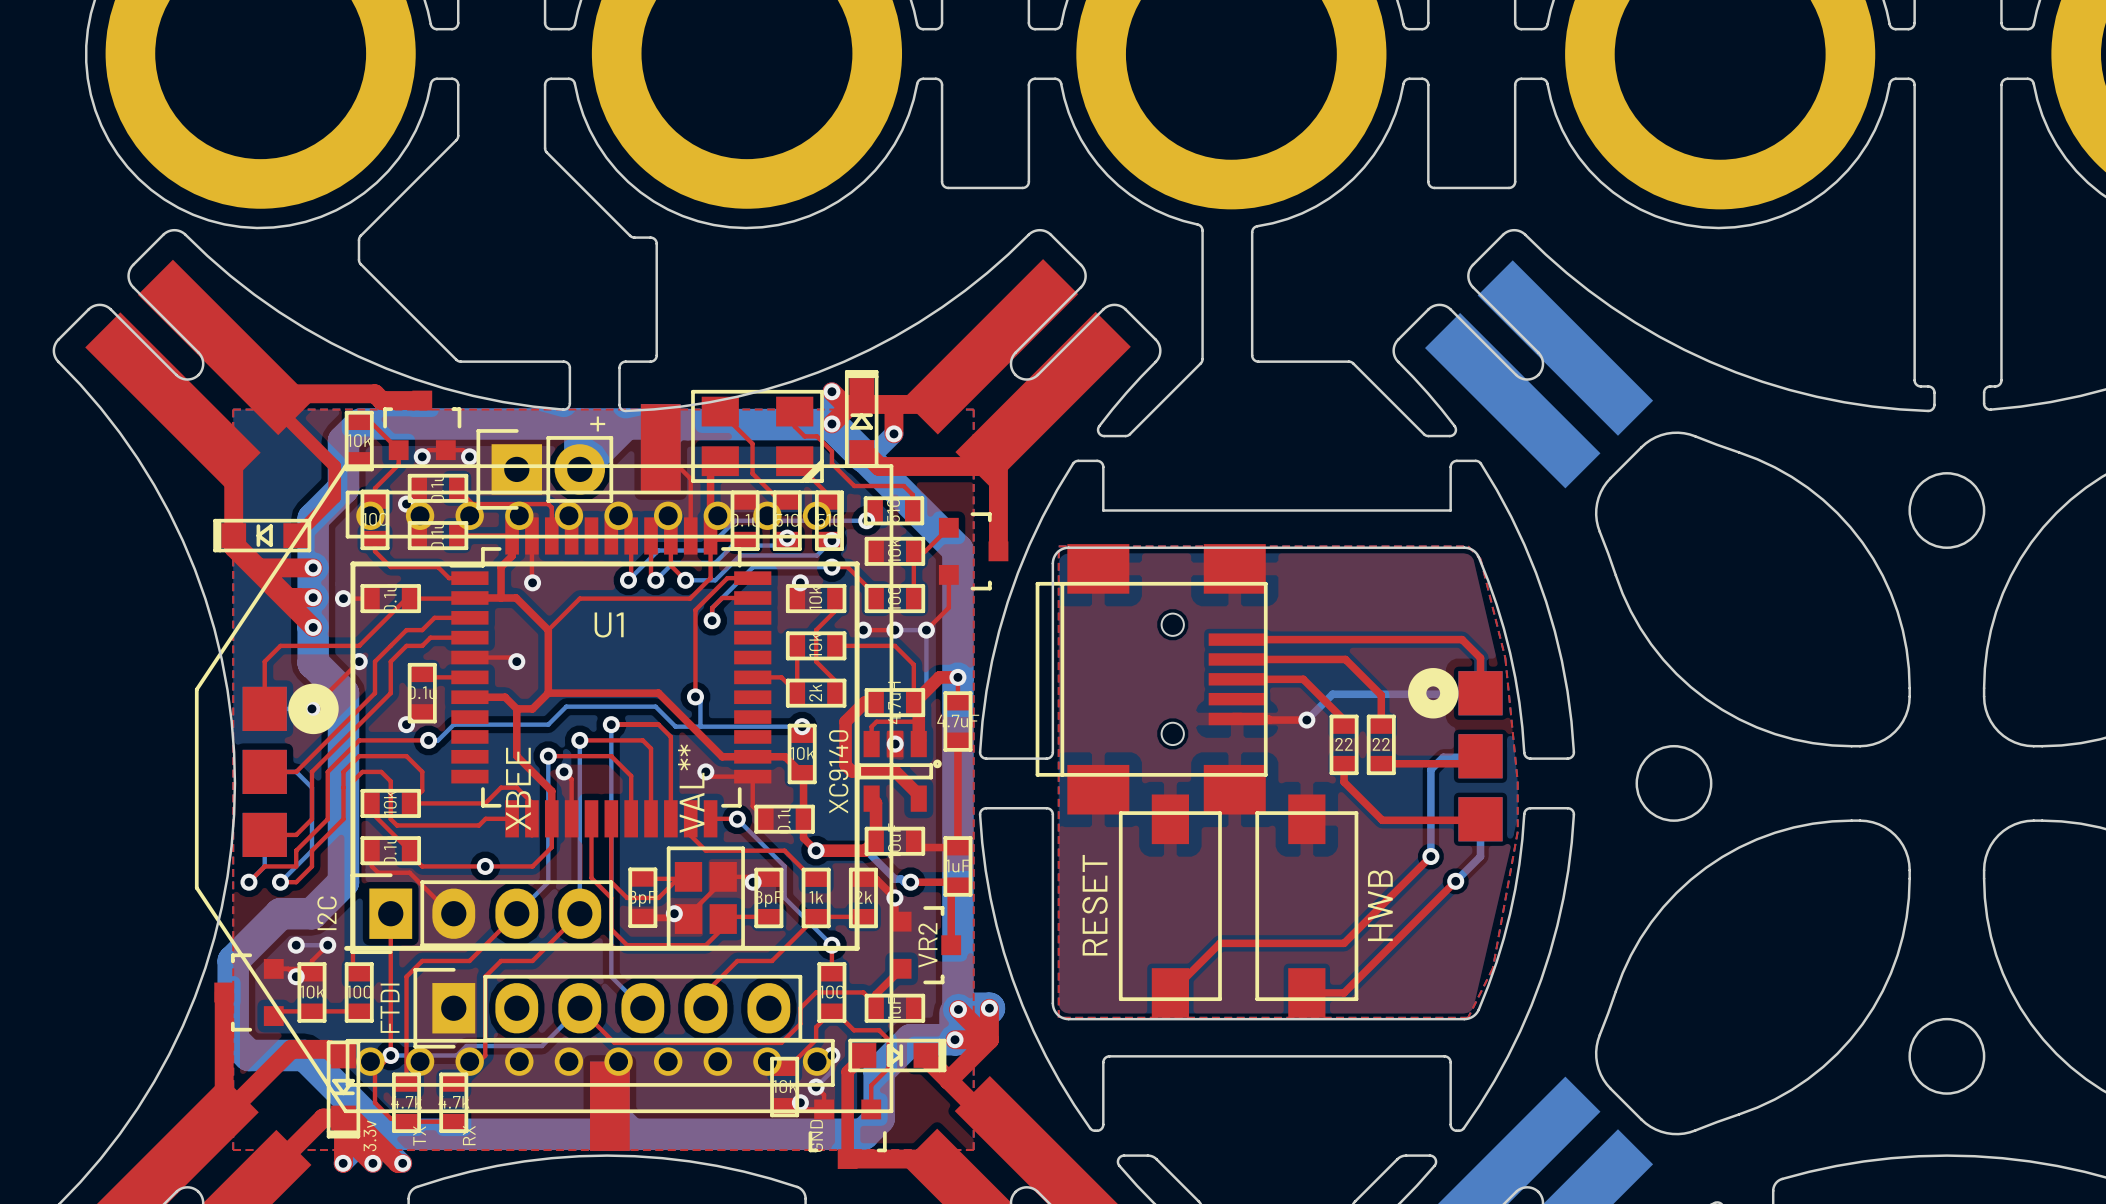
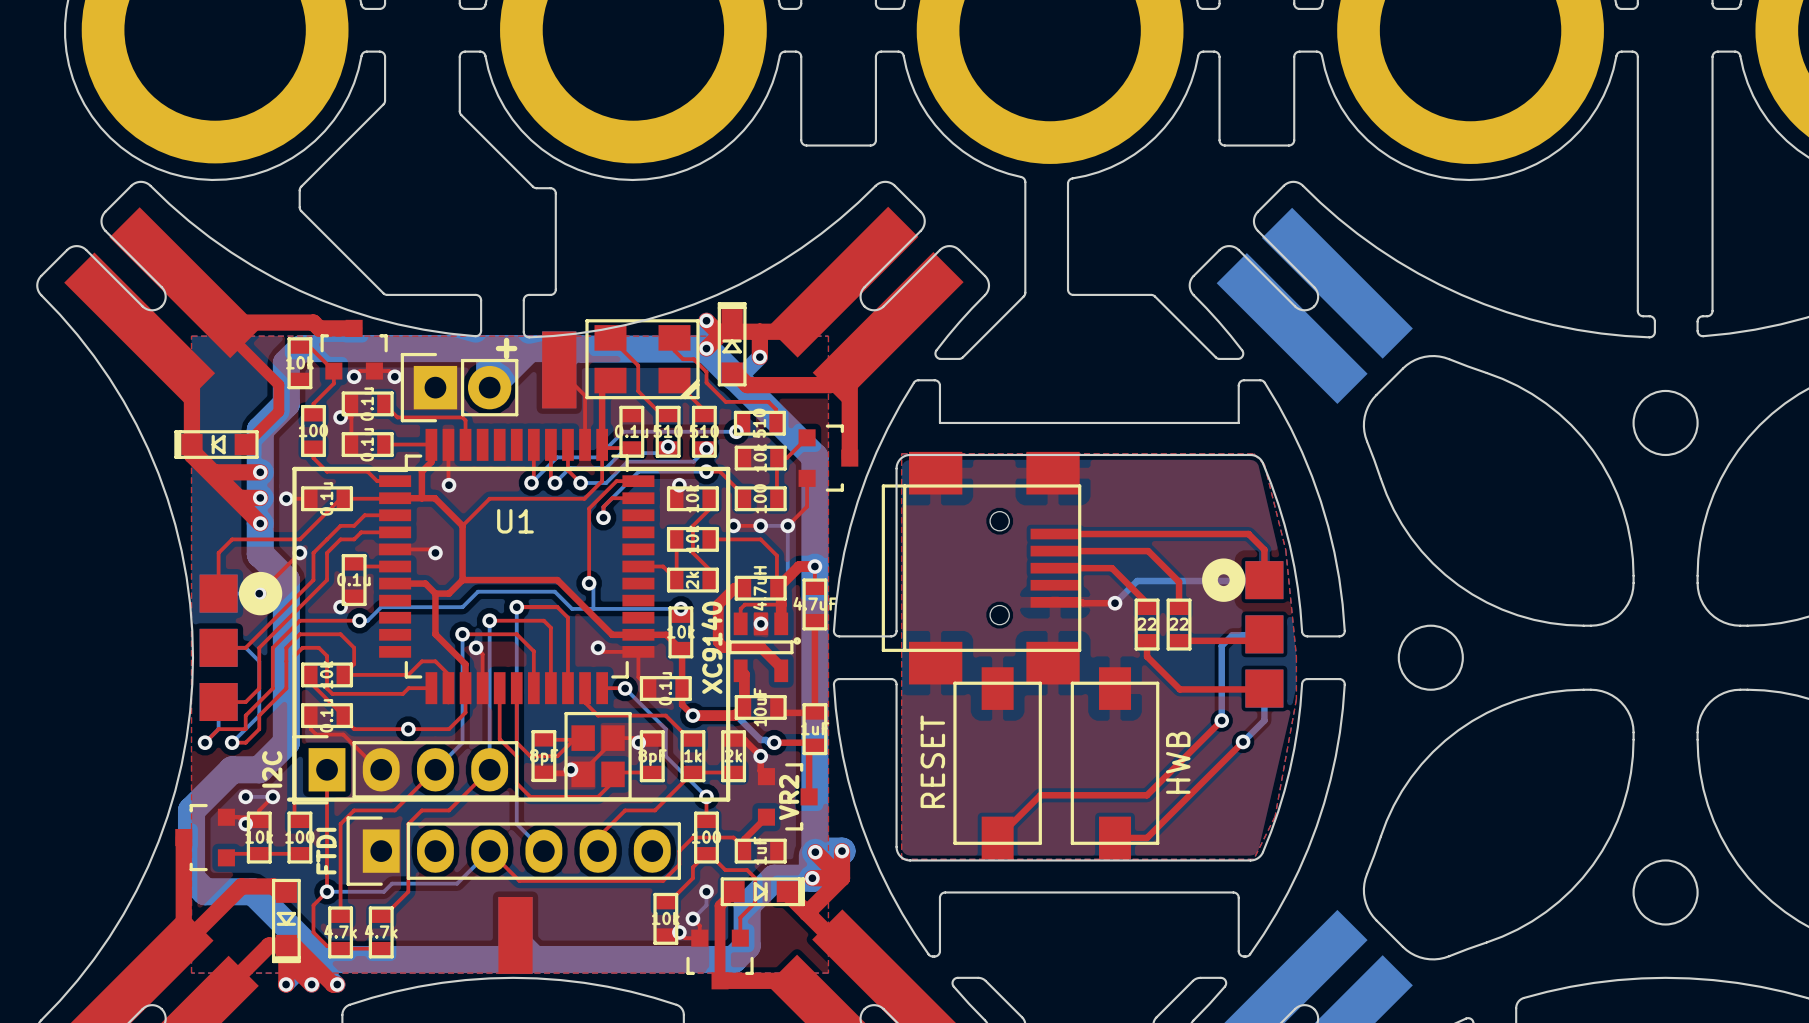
XBEE: VAL** (544, 788) -> none

